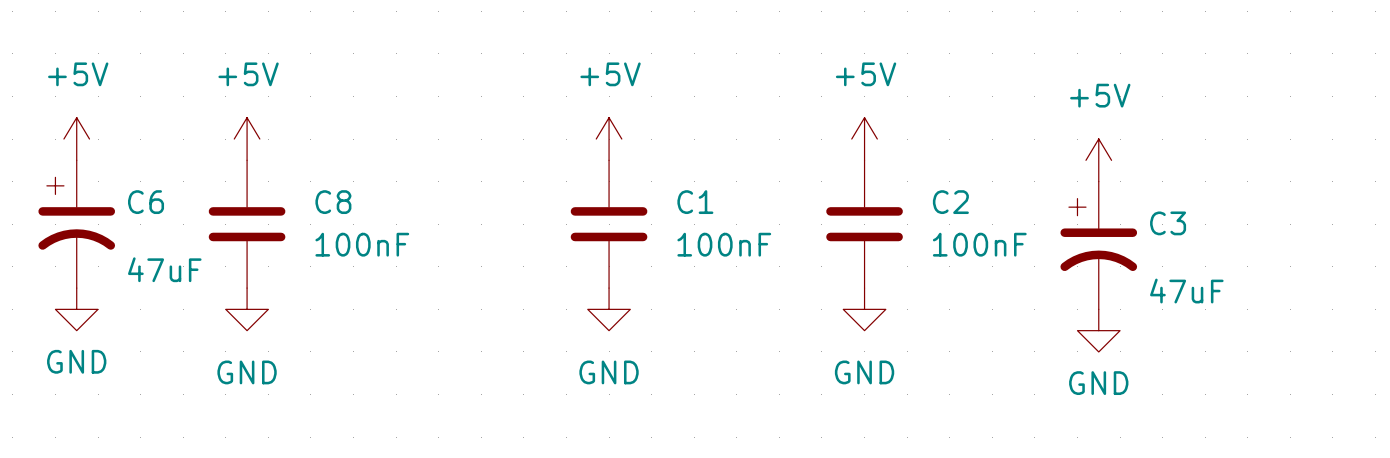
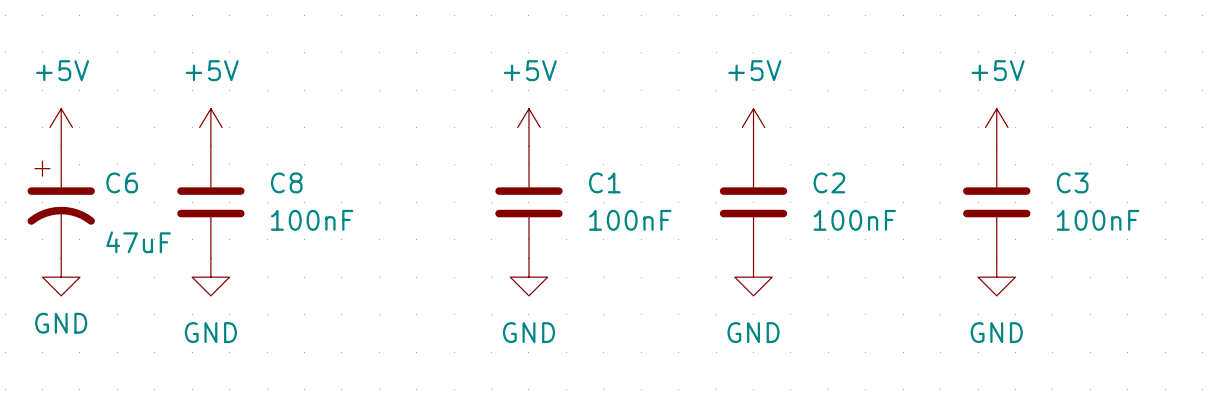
power symbol position: +5V (1098, 160) -> +5V (996, 127)
C3 symbol: [1060, 181, 1138, 310] -> [963, 146, 1031, 259]
C3 value: 47uF (1186, 291) -> 100nF (1098, 220)
power symbol position: GND (1098, 330) -> GND (996, 277)
power symbol text position: GND (1098, 383) -> GND (996, 332)

